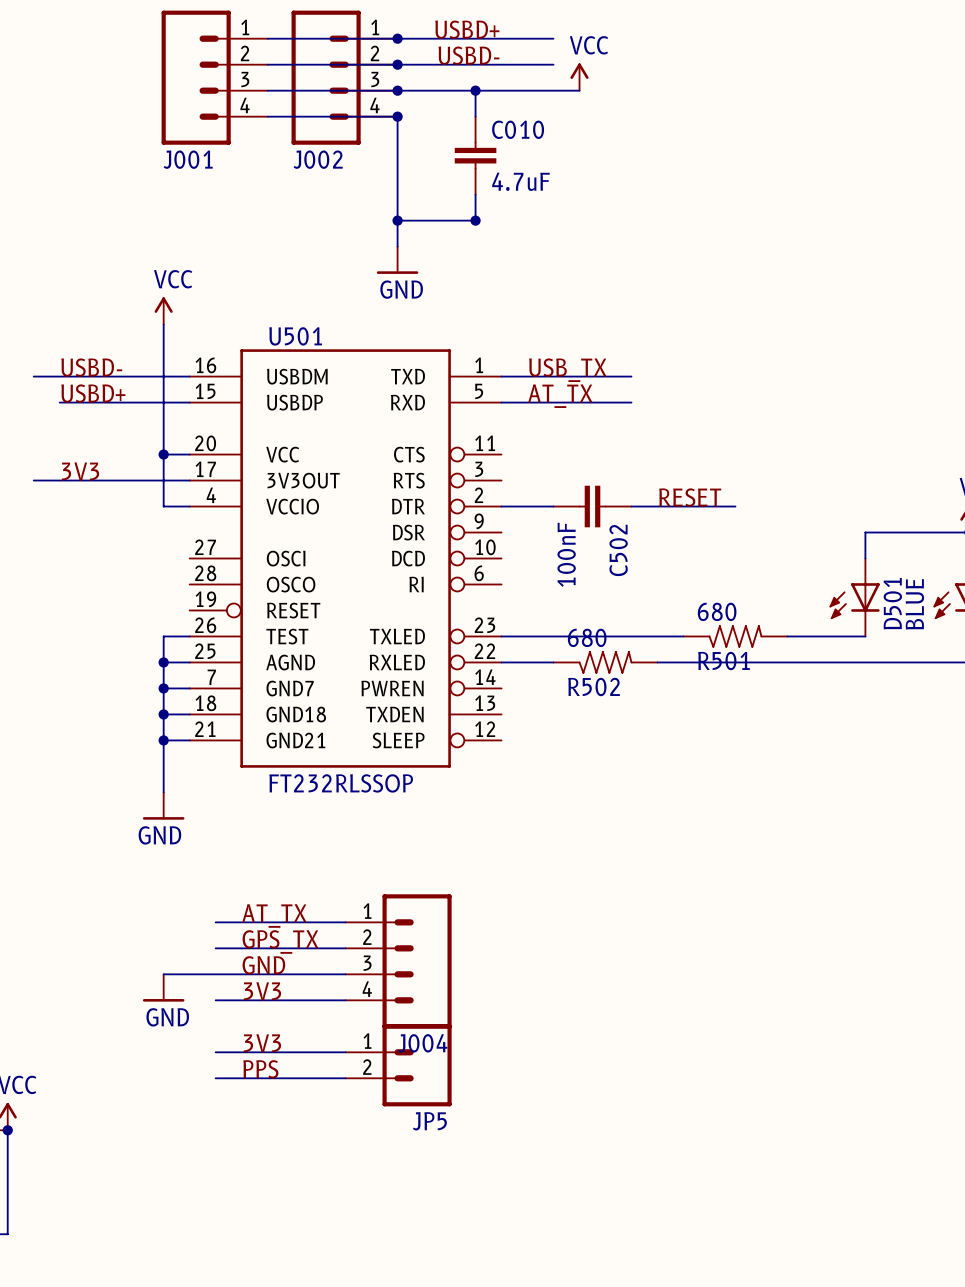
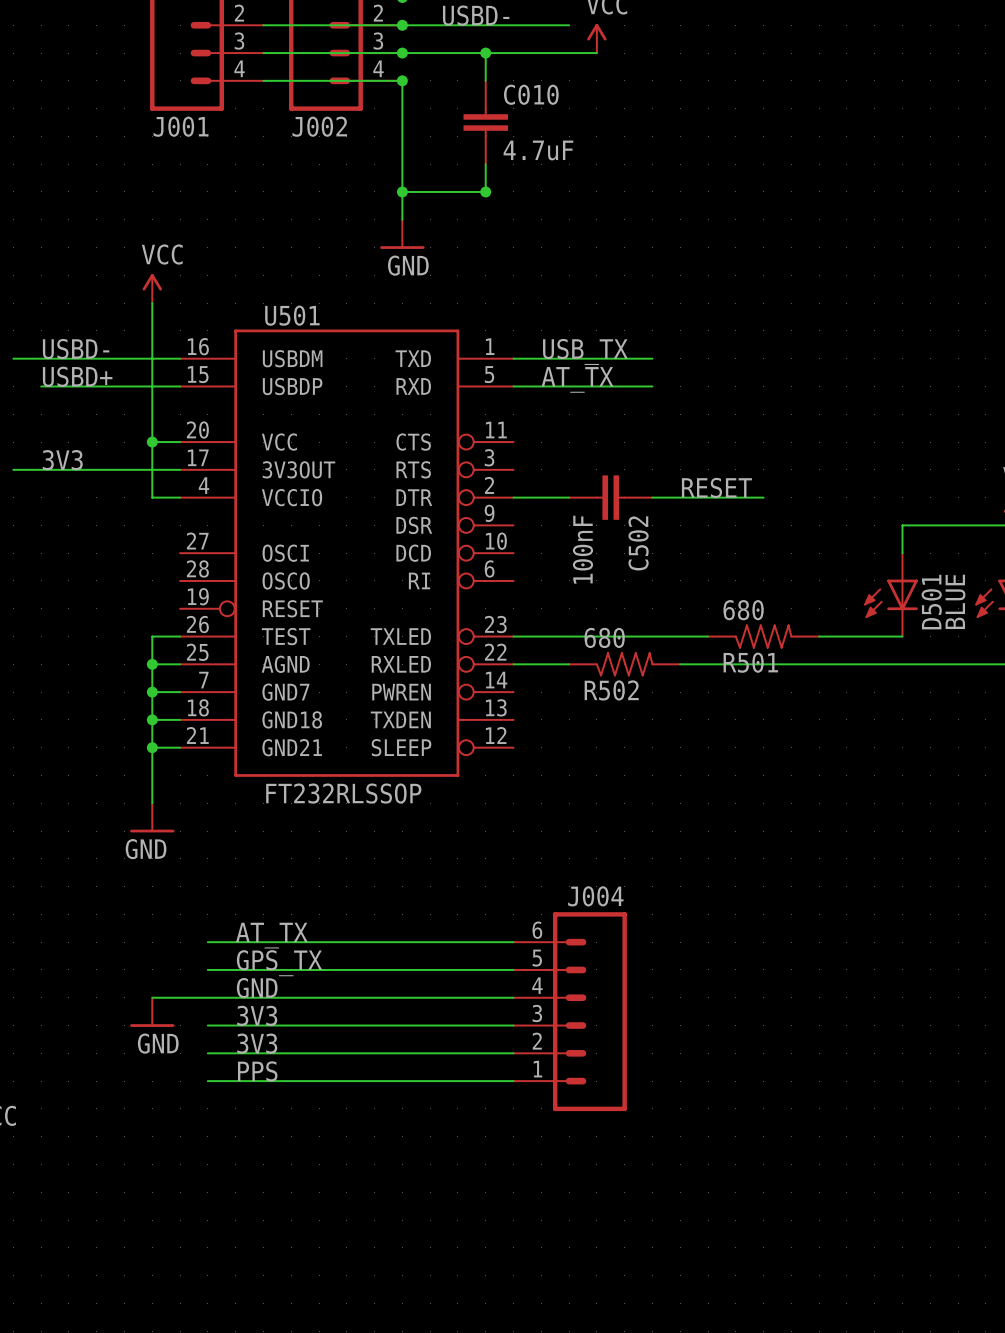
J004 symbol: [345, 894, 452, 1029] -> [513, 912, 627, 1112]
wire: none -> (346, 942) (513, 942)
wire: none -> (346, 969) (513, 969)
wire: none -> (346, 997) (513, 997)
wire: none -> (346, 1025) (513, 1025)
label: none -> 3V3 (257, 1043)
wire: none -> (207, 1053) (513, 1053)
label: 3V3 (262, 1043) -> PPS (257, 1071)
J004 name position: J004 (422, 1043) -> J004 (595, 896)
wire: none -> (346, 1081) (513, 1081)
JP5: (398, 1065) -> none
label: PPS (260, 1069) -> none
wire: (215, 1078) (345, 1078) -> none

